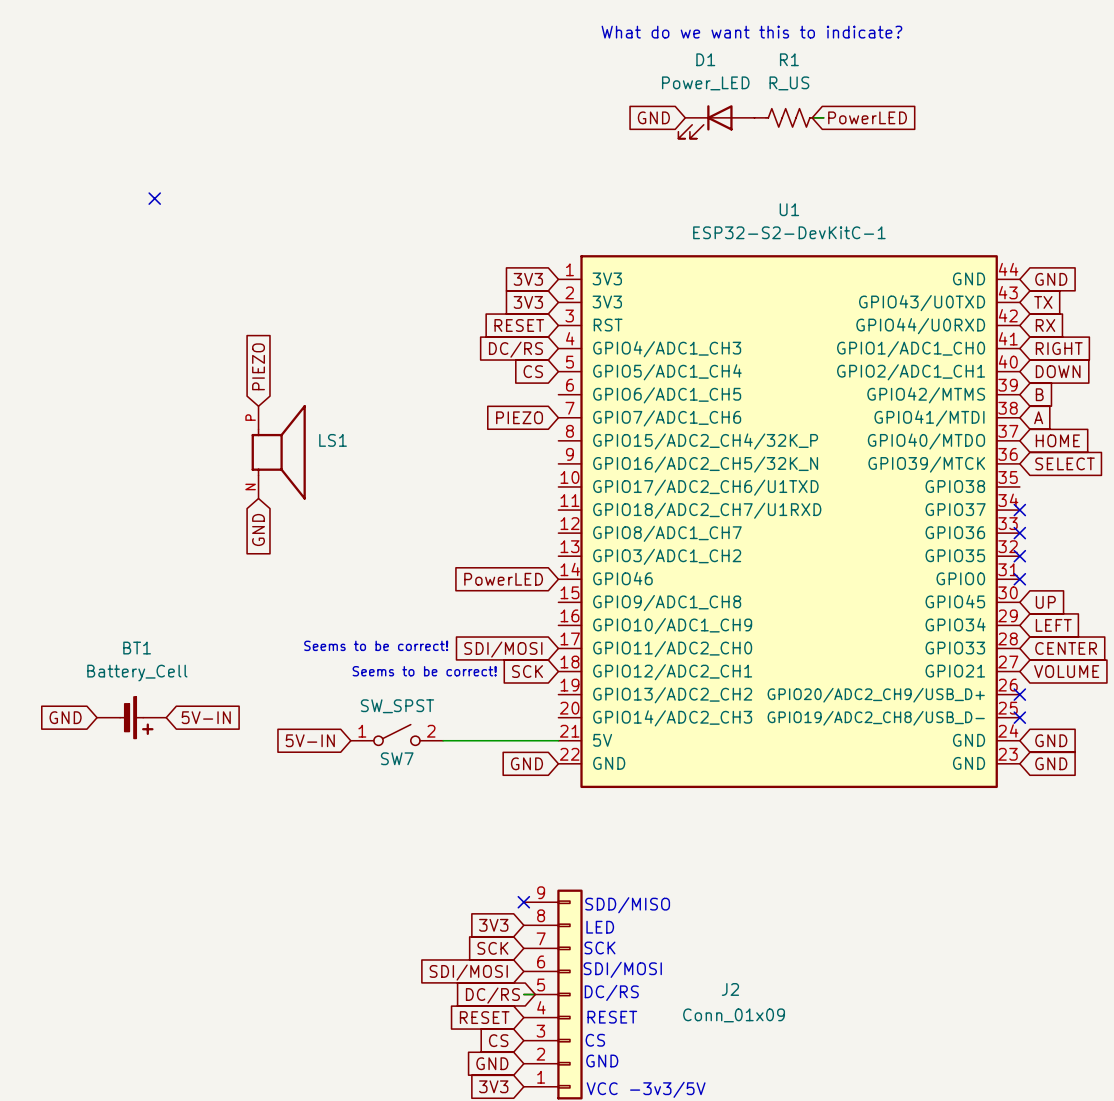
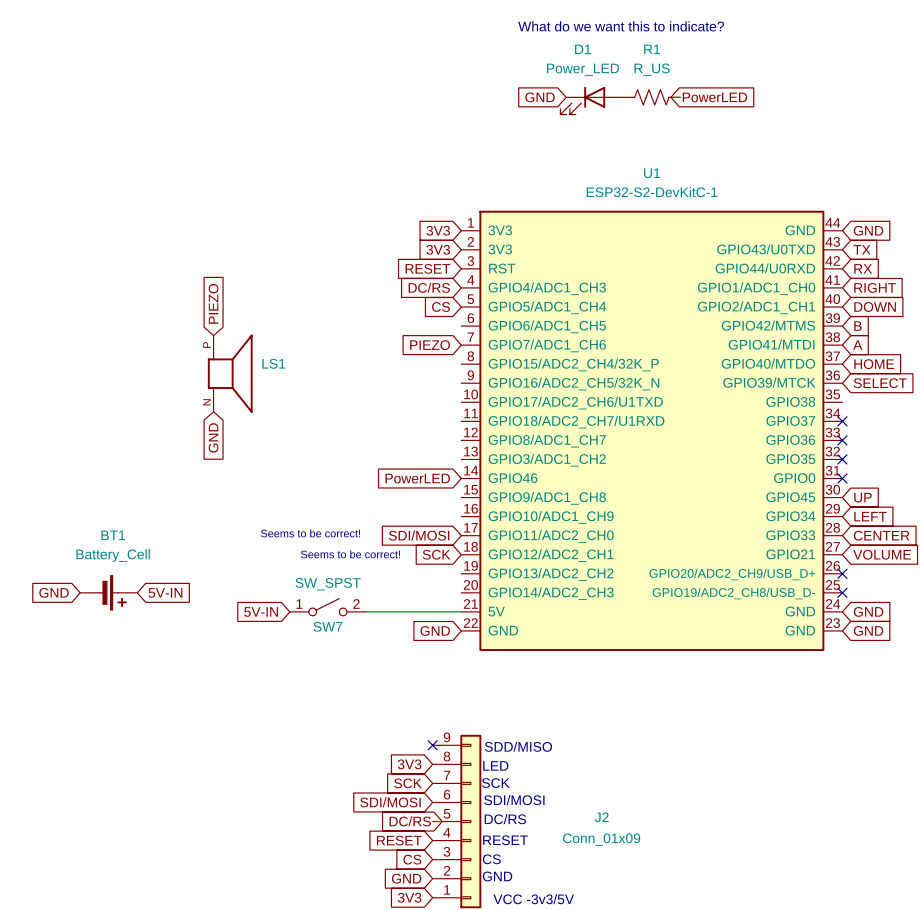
no-connect mark: (154, 198) -> none

